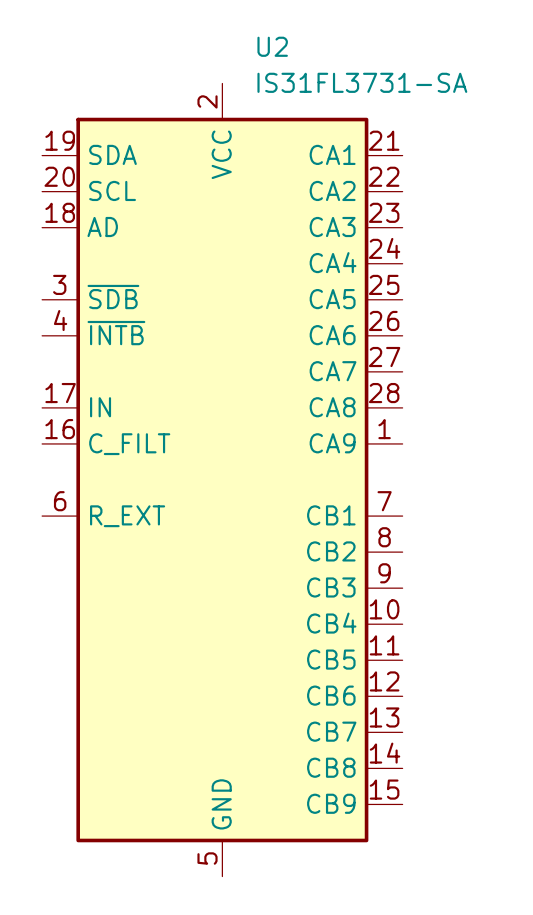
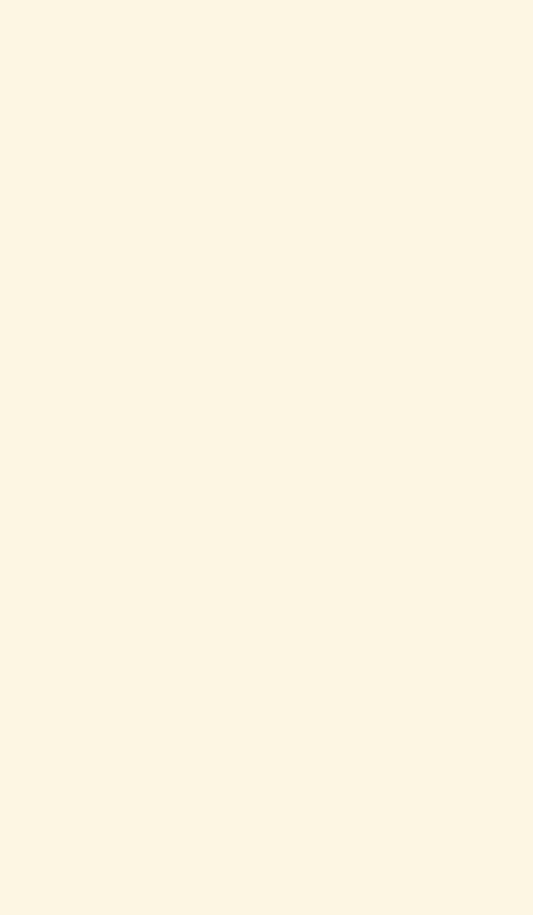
U2: IS31FL3731-SA (222, 480) -> none

